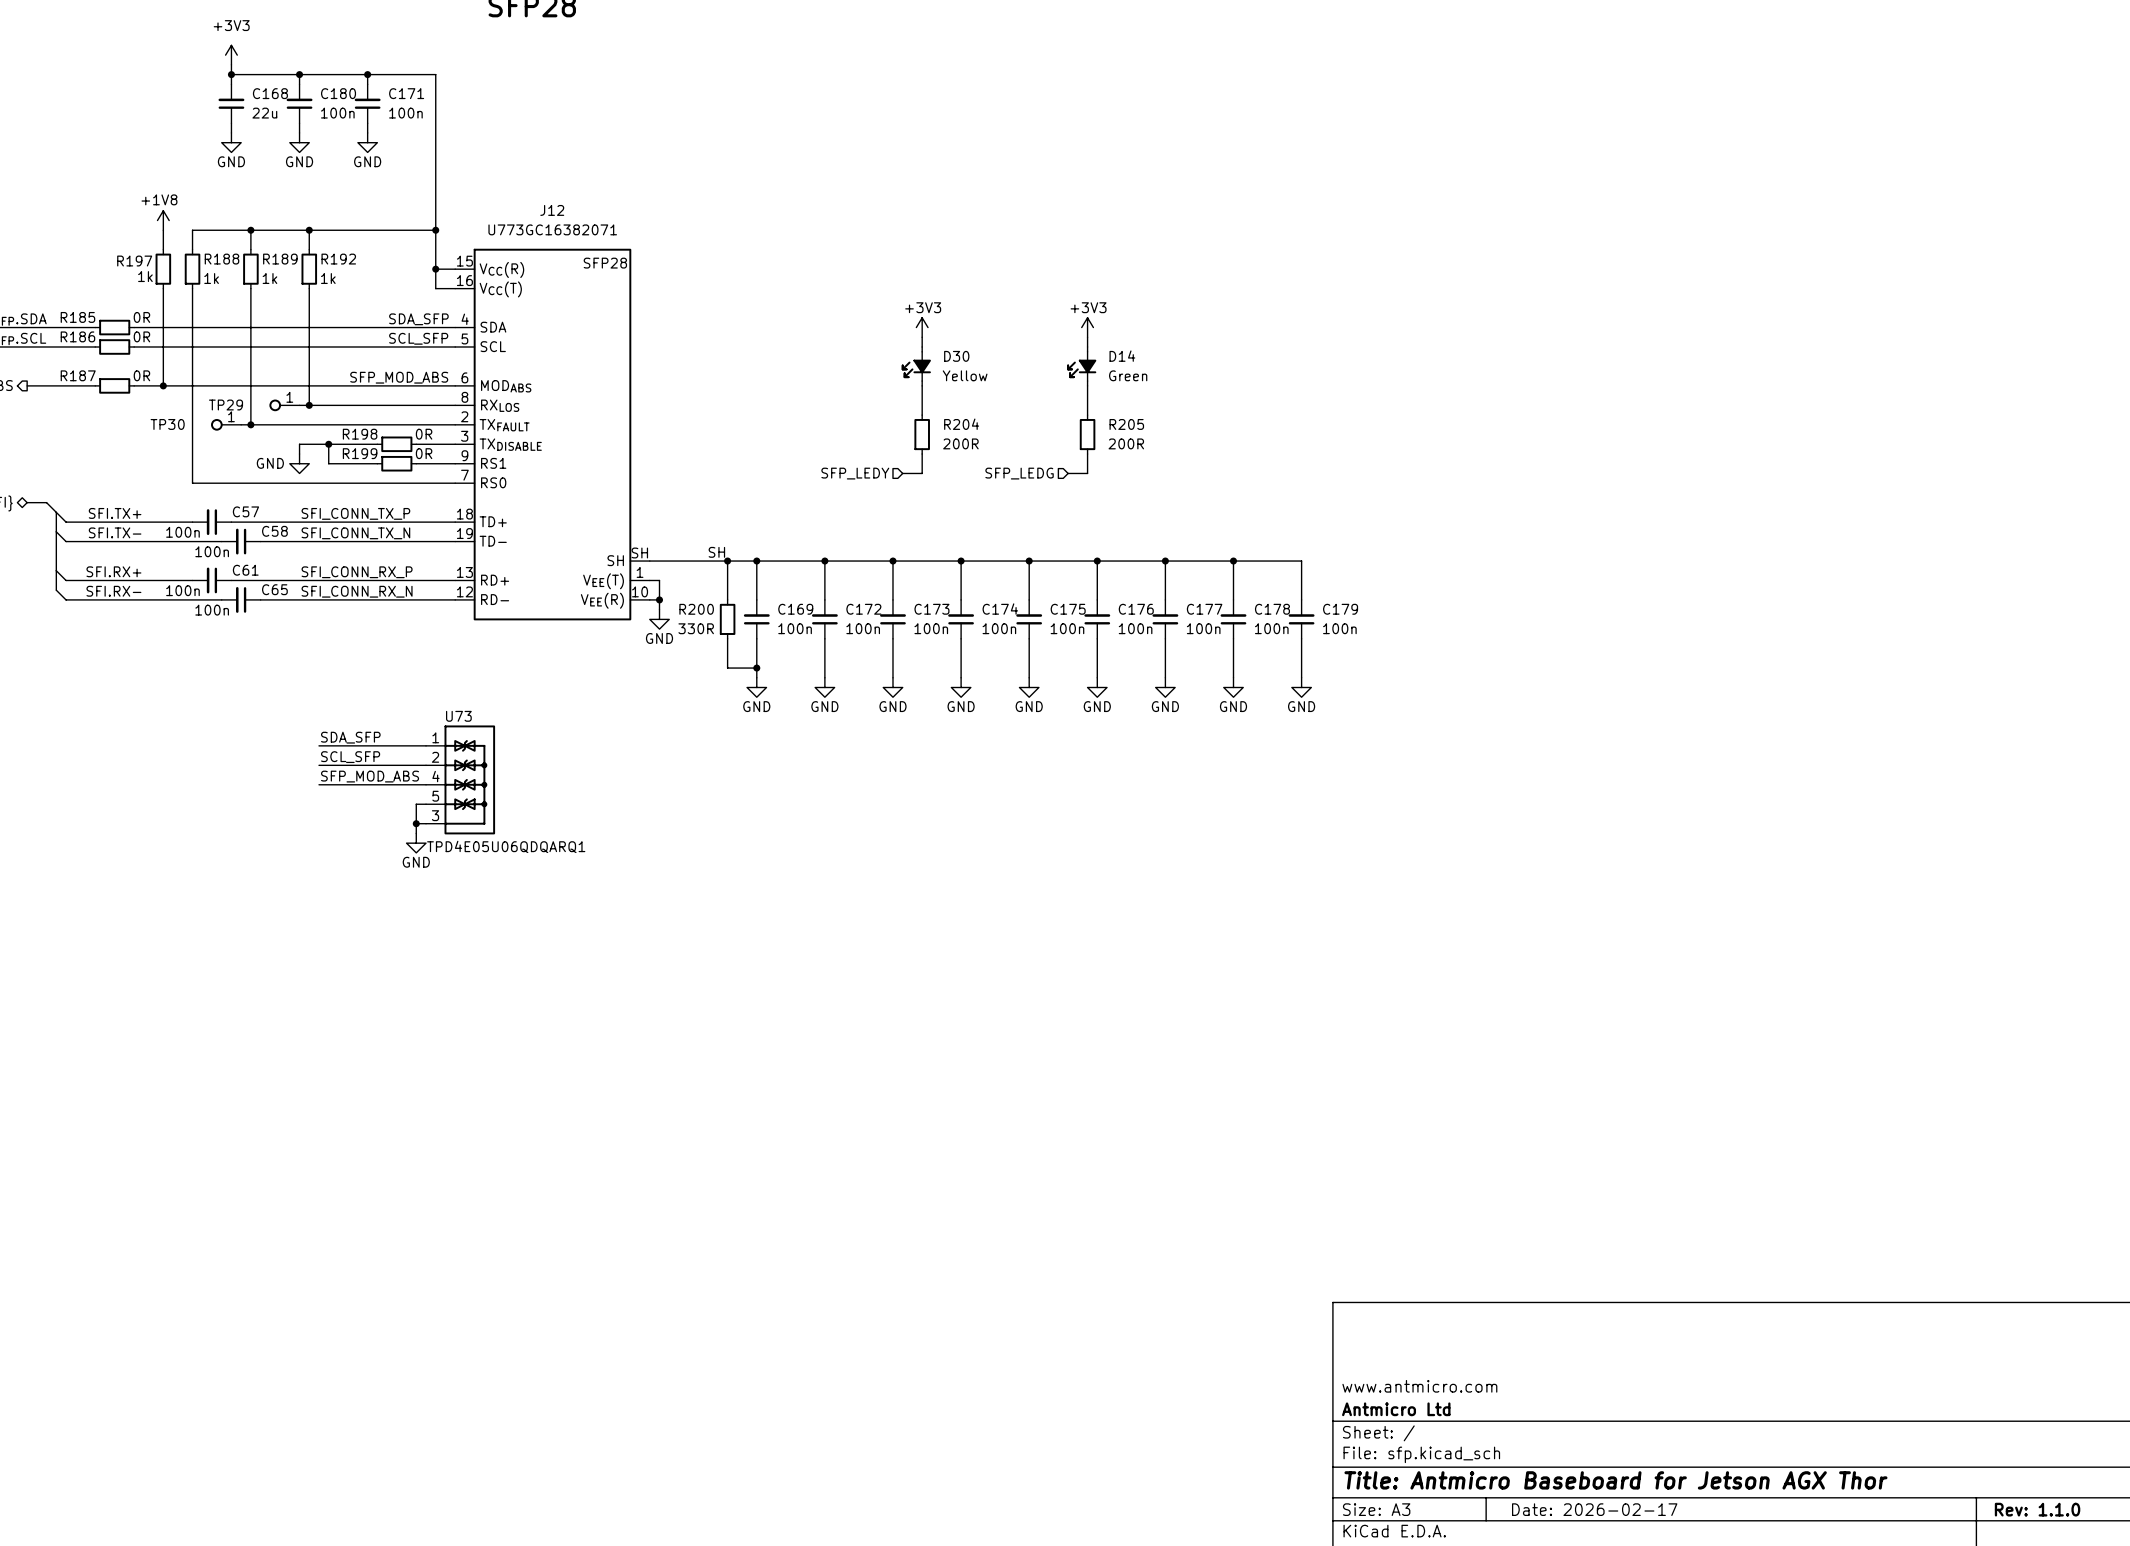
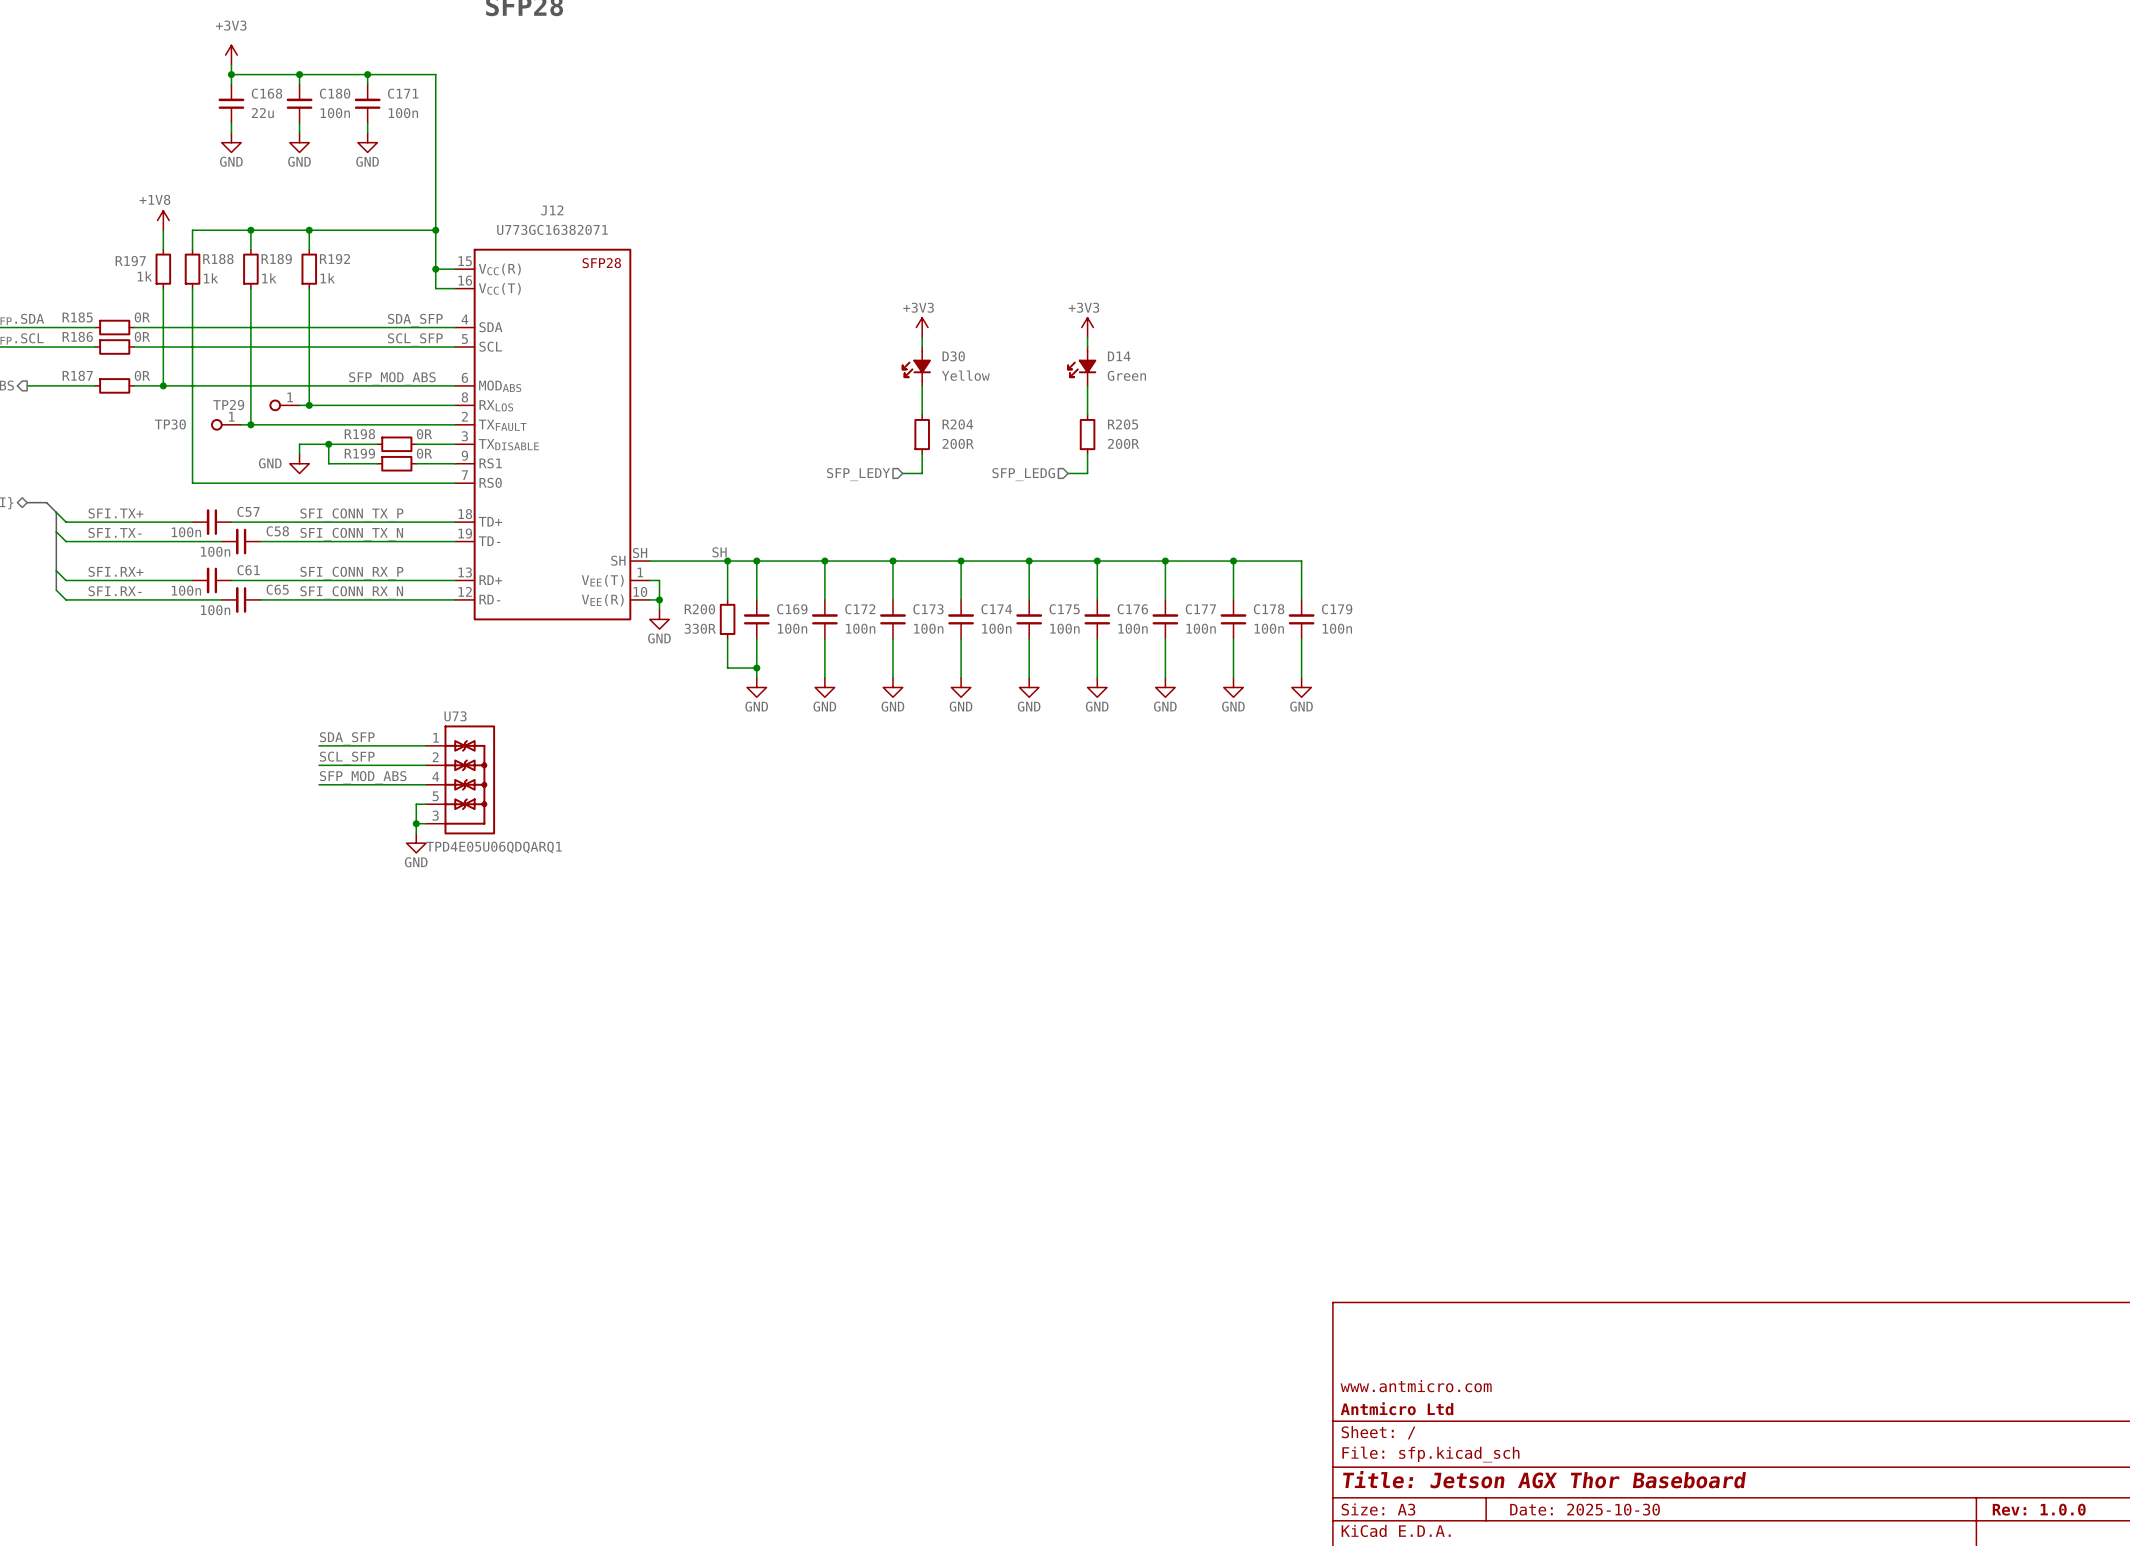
title block: Title: Antmicro Baseboard for Jetson AGX Thor (1615, 1480) -> Title: Jetson AGX Thor Baseboard (1544, 1479)
title block: Date: 2026-02-17 (1594, 1509) -> Date: 2025-10-30 (1585, 1509)
title block: Rev: 1.1.0 (2037, 1509) -> Rev: 1.0.0 (2039, 1509)

